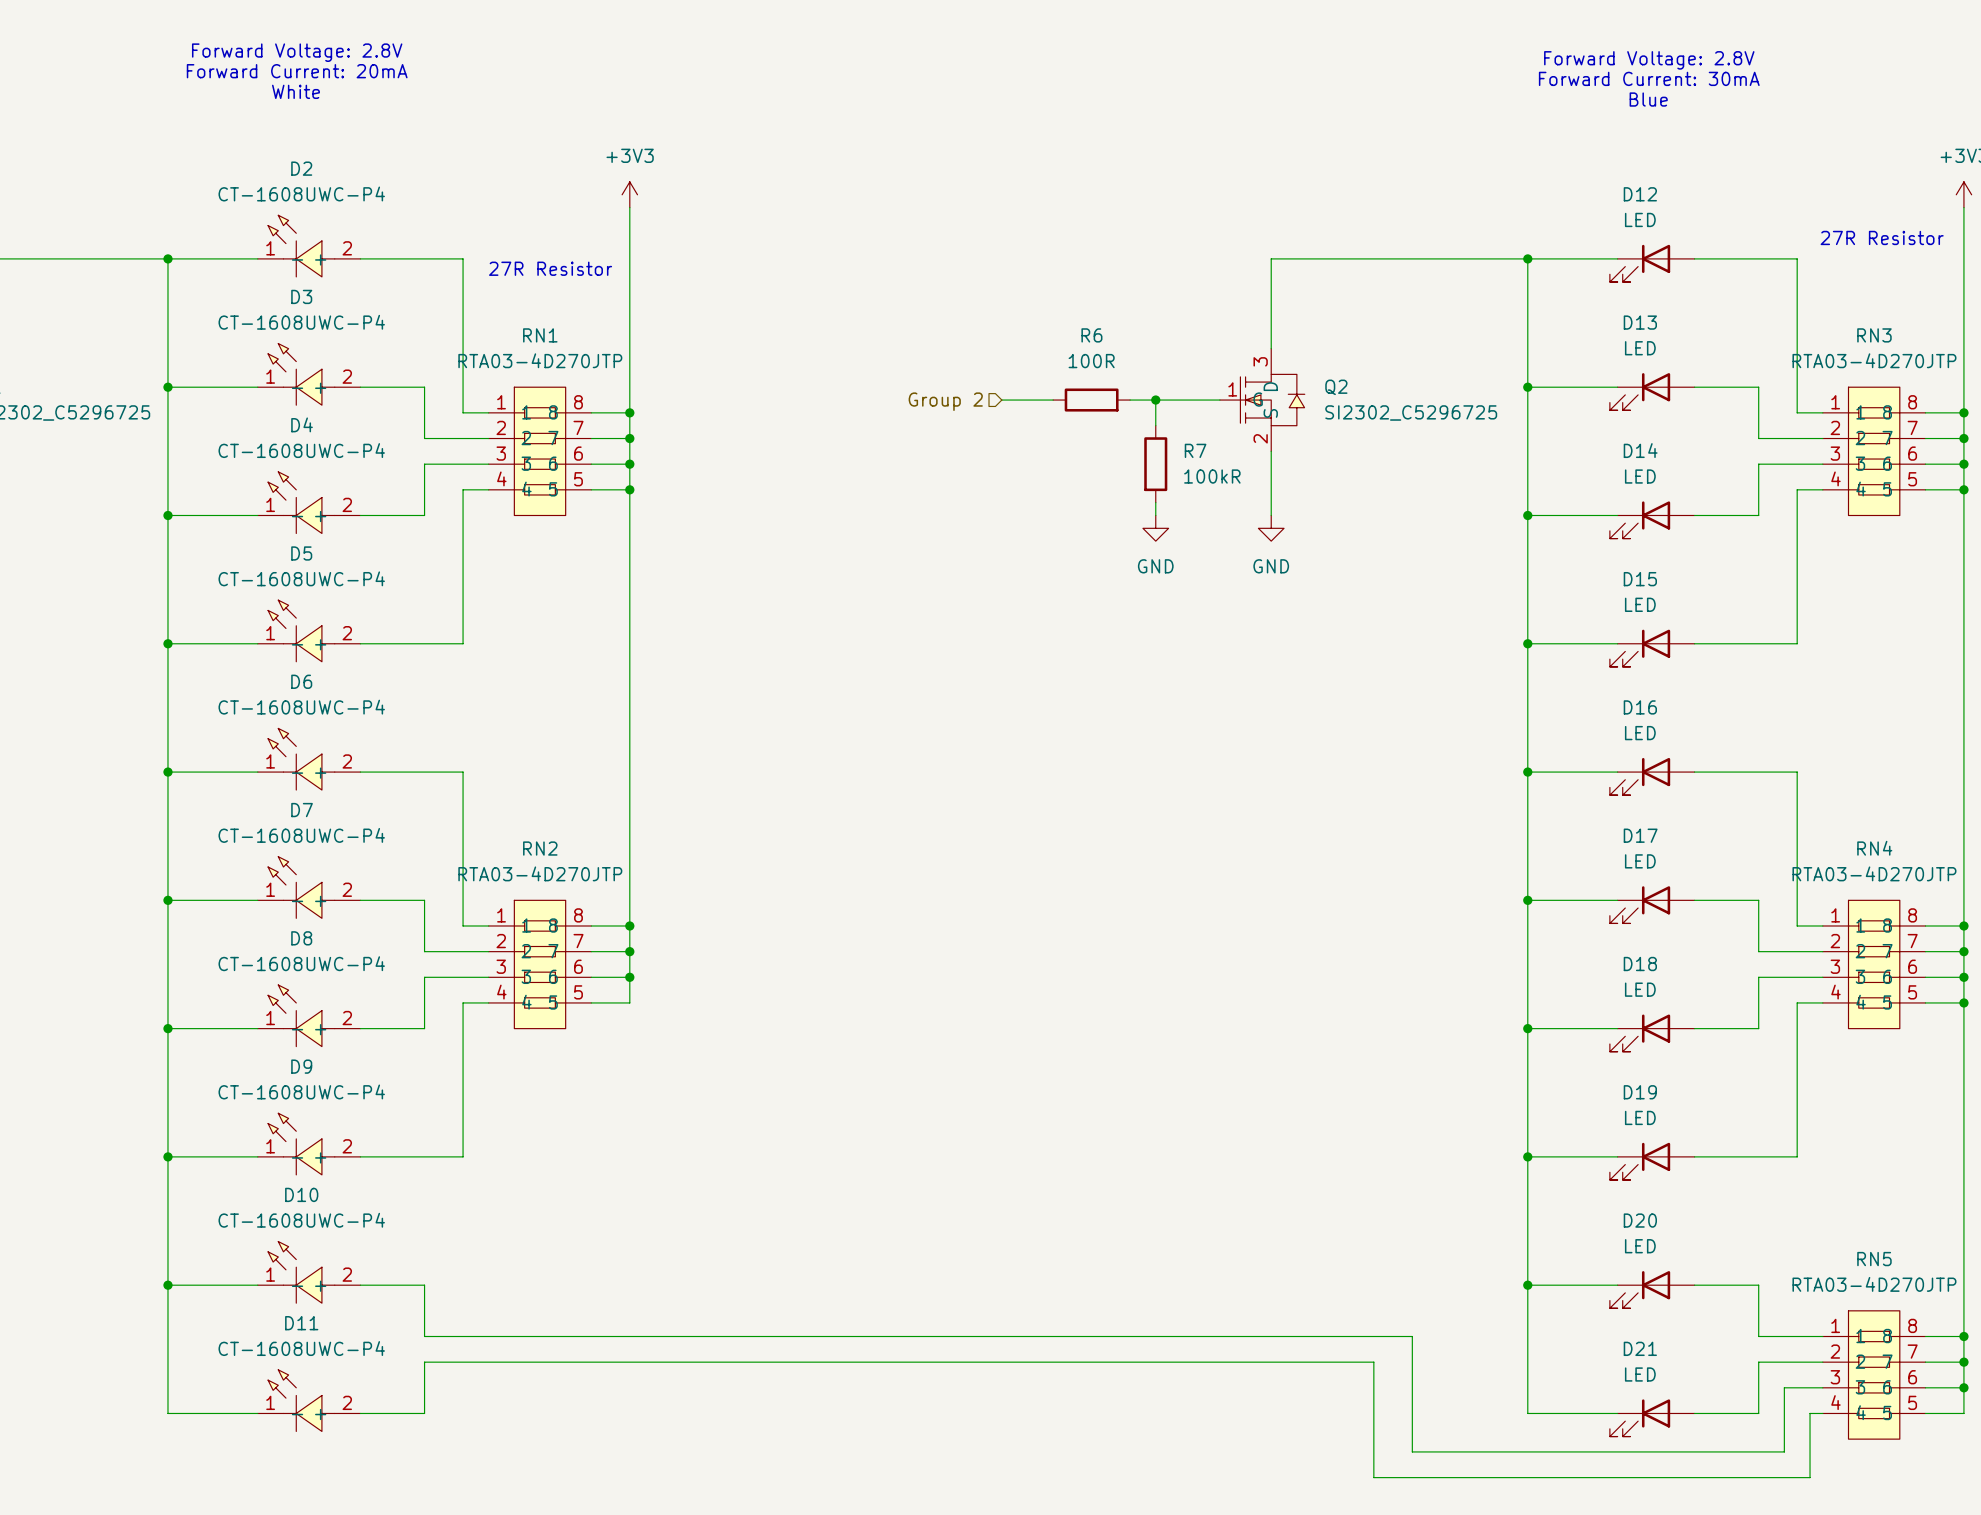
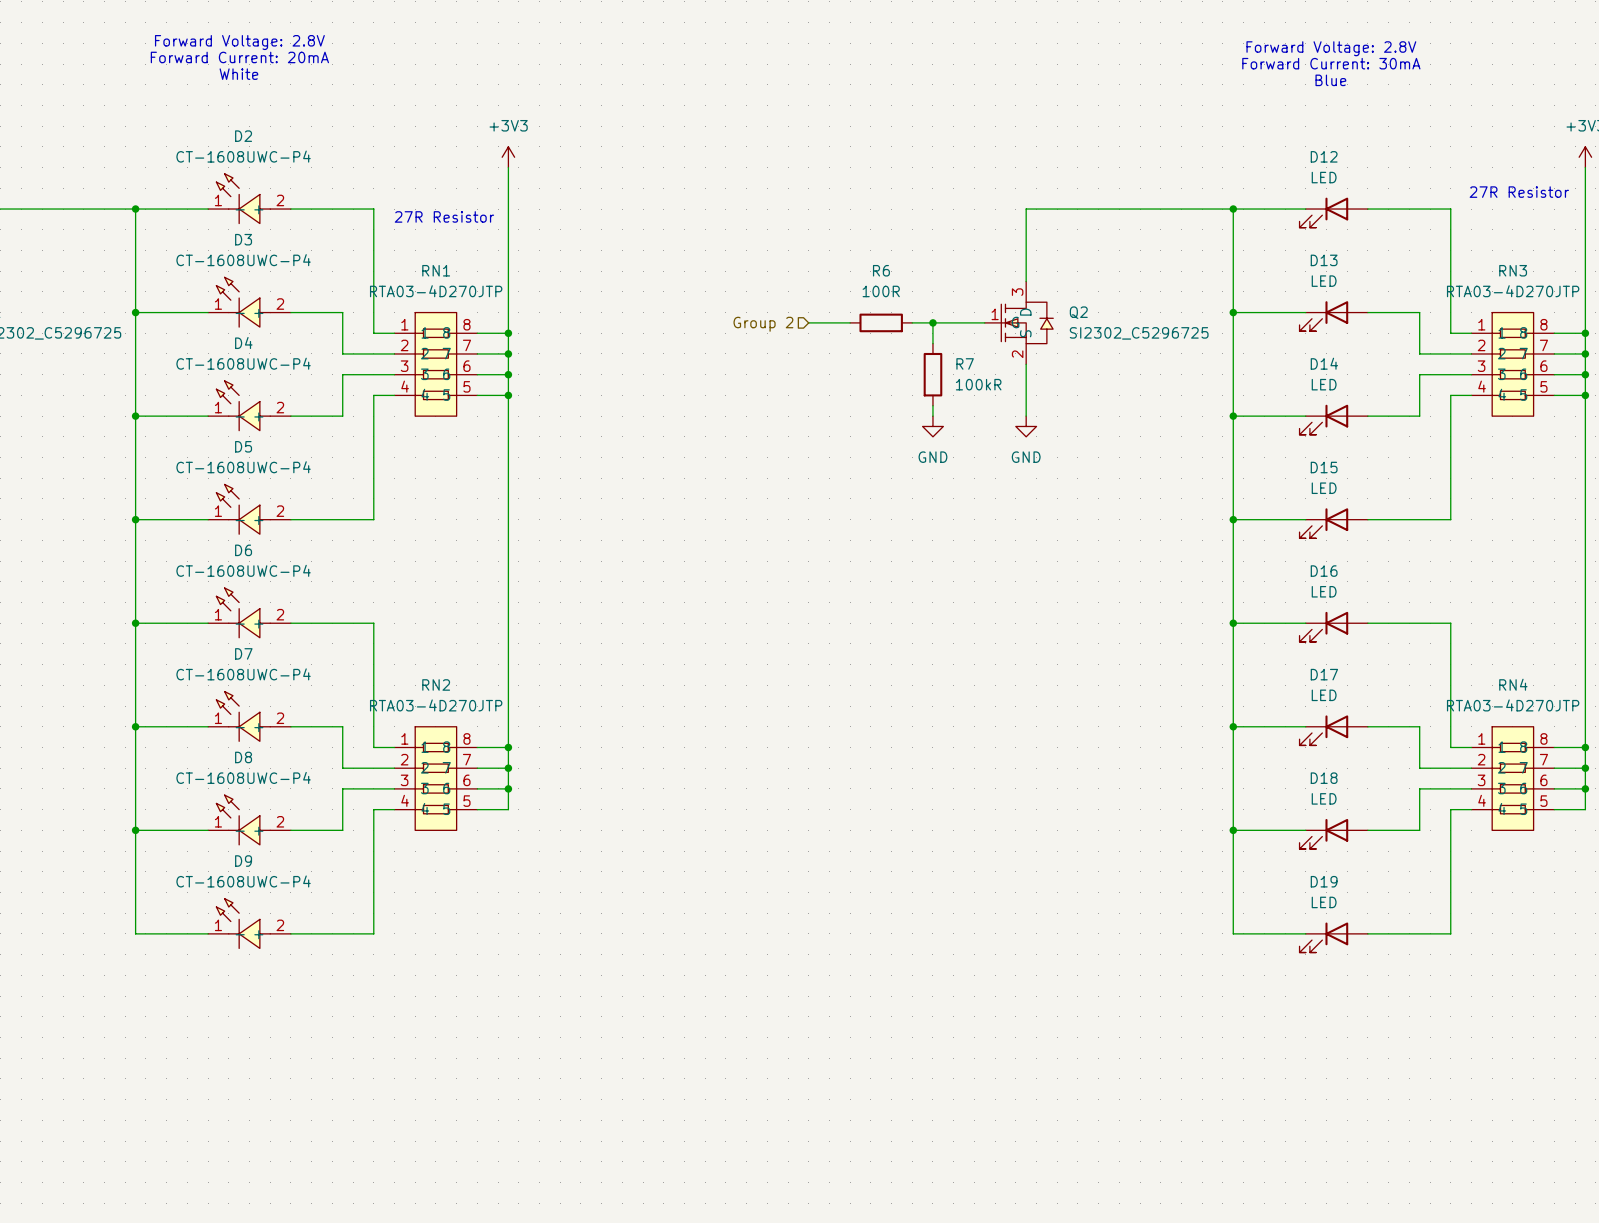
wire: (1963, 1002) (1963, 1413) (1925, 1413) -> none
junction: (1963, 1002) -> none
wire: (167, 1156) (167, 1413) (257, 1413) -> none
junction: (167, 1156) -> none
wire: (1527, 1156) (1527, 1413) (1617, 1413) -> none
junction: (1527, 1156) -> none
D10: CT-1608UWC-P4 (309, 1272) -> none
wire: (167, 1285) (257, 1285) -> none
junction: (167, 1285) -> none
wire: (360, 1285) (424, 1285) (424, 1336) (1412, 1336) (1412, 1451) (1784, 1451) (1784, 1387) (1822, 1387) -> none
wire: (1527, 1285) (1617, 1285) -> none
junction: (1527, 1285) -> none
wire: (1694, 1285) (1758, 1285) (1758, 1336) (1822, 1336) -> none
D20: LED (1652, 1289) -> none
wire: (1925, 1336) (1963, 1336) -> none
junction: (1963, 1336) -> none
wire: (1822, 1362) (1758, 1362) (1758, 1413) (1694, 1413) -> none
wire: (1925, 1362) (1963, 1362) -> none
junction: (1963, 1362) -> none
RN5: RTA03-4D270JTP (1874, 1374) -> none
wire: (1925, 1387) (1963, 1387) -> none
junction: (1963, 1387) -> none
D11: CT-1608UWC-P4 (309, 1400) -> none
wire: (360, 1413) (424, 1413) (424, 1362) (1373, 1362) (1373, 1477) (1810, 1477) (1810, 1413) (1822, 1413) -> none
D21: LED (1652, 1417) -> none

